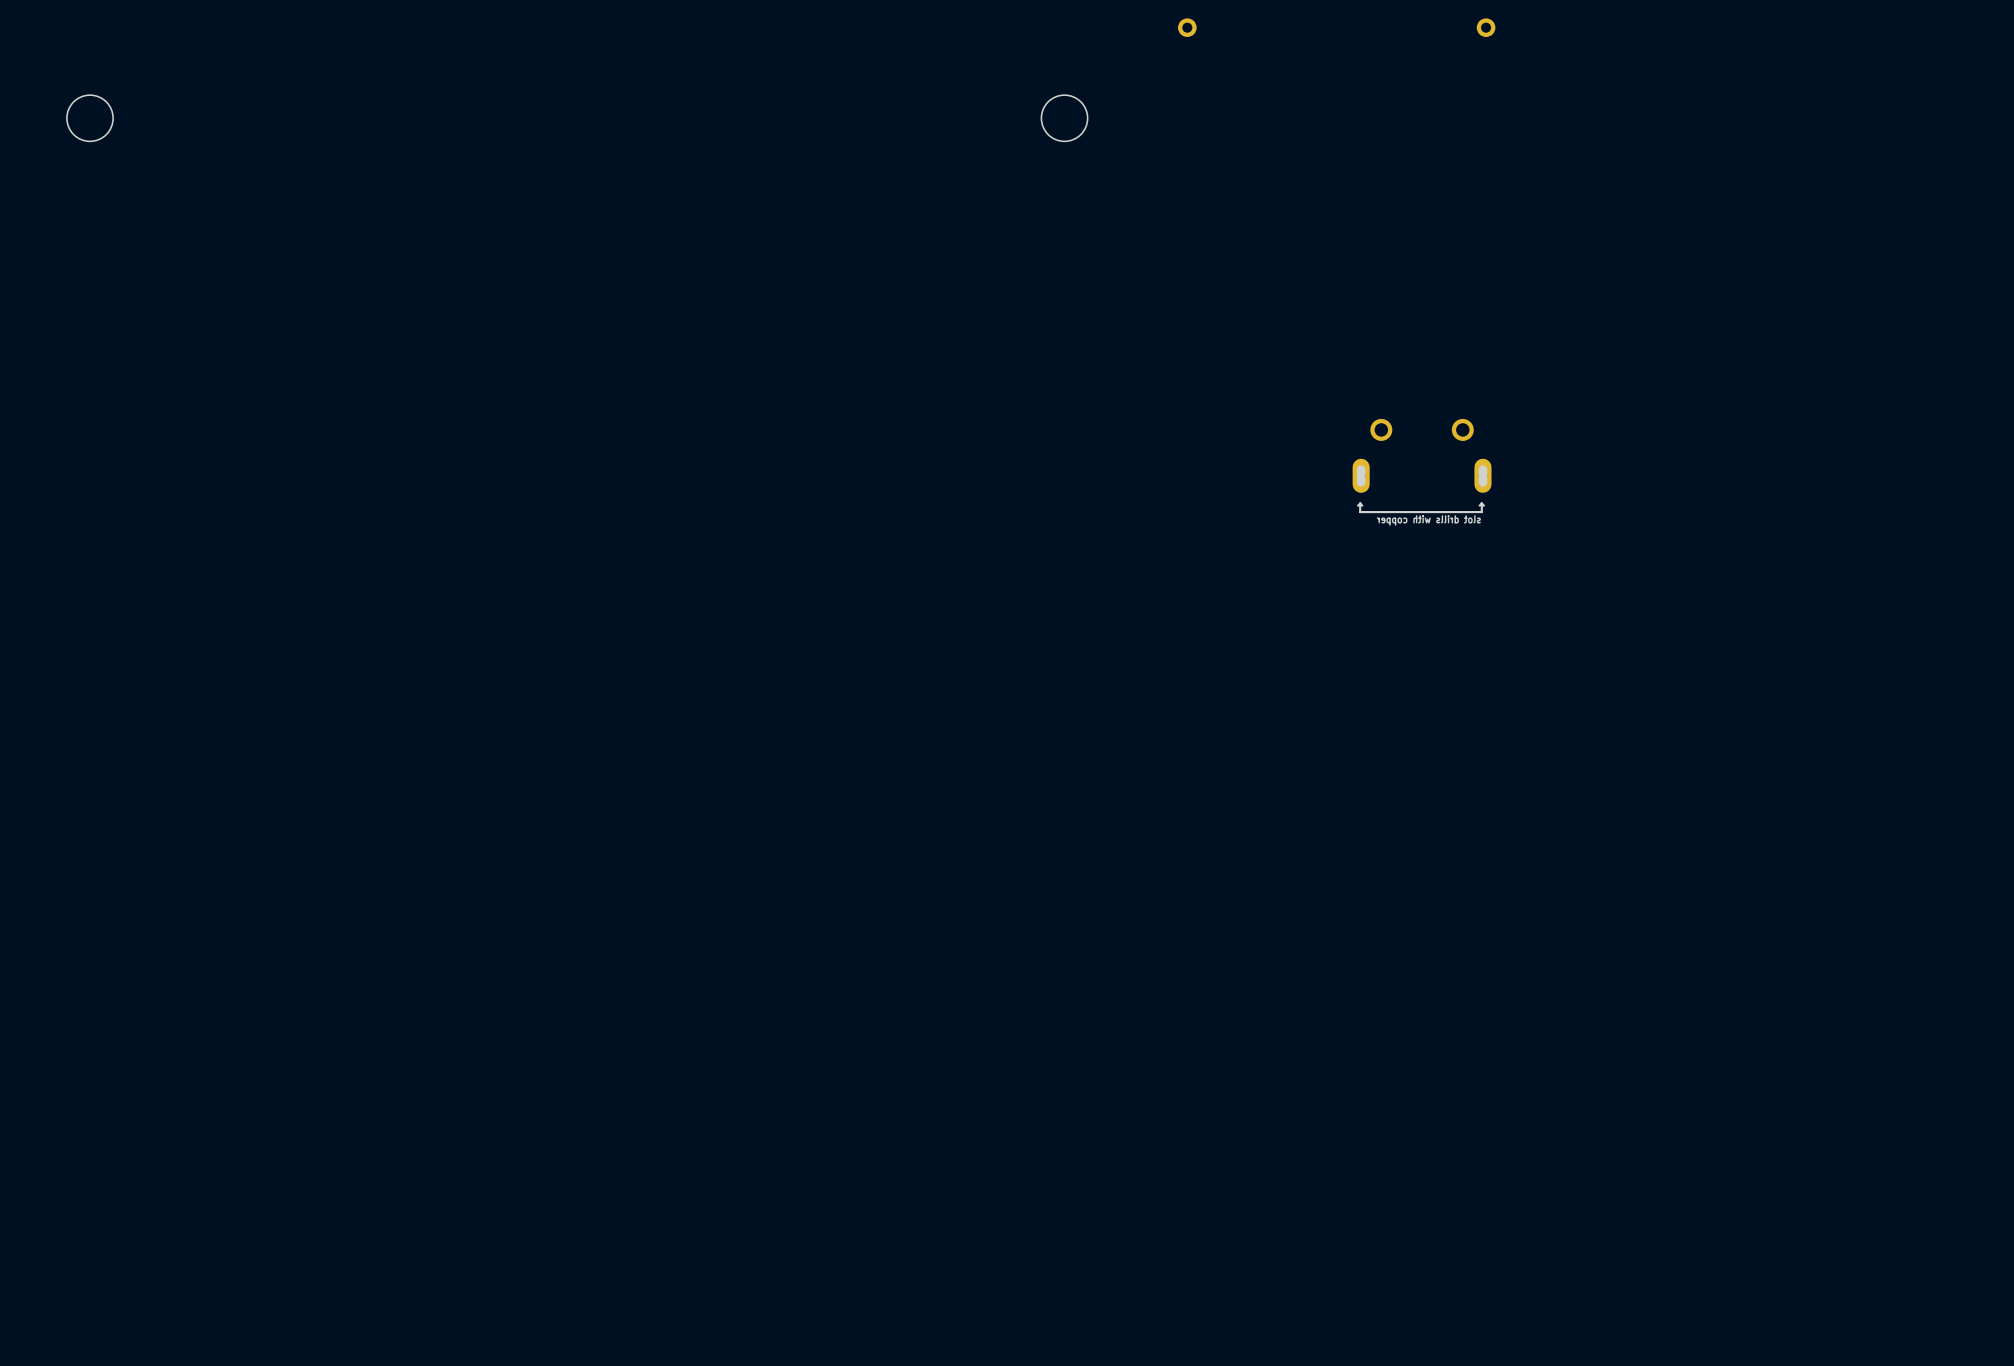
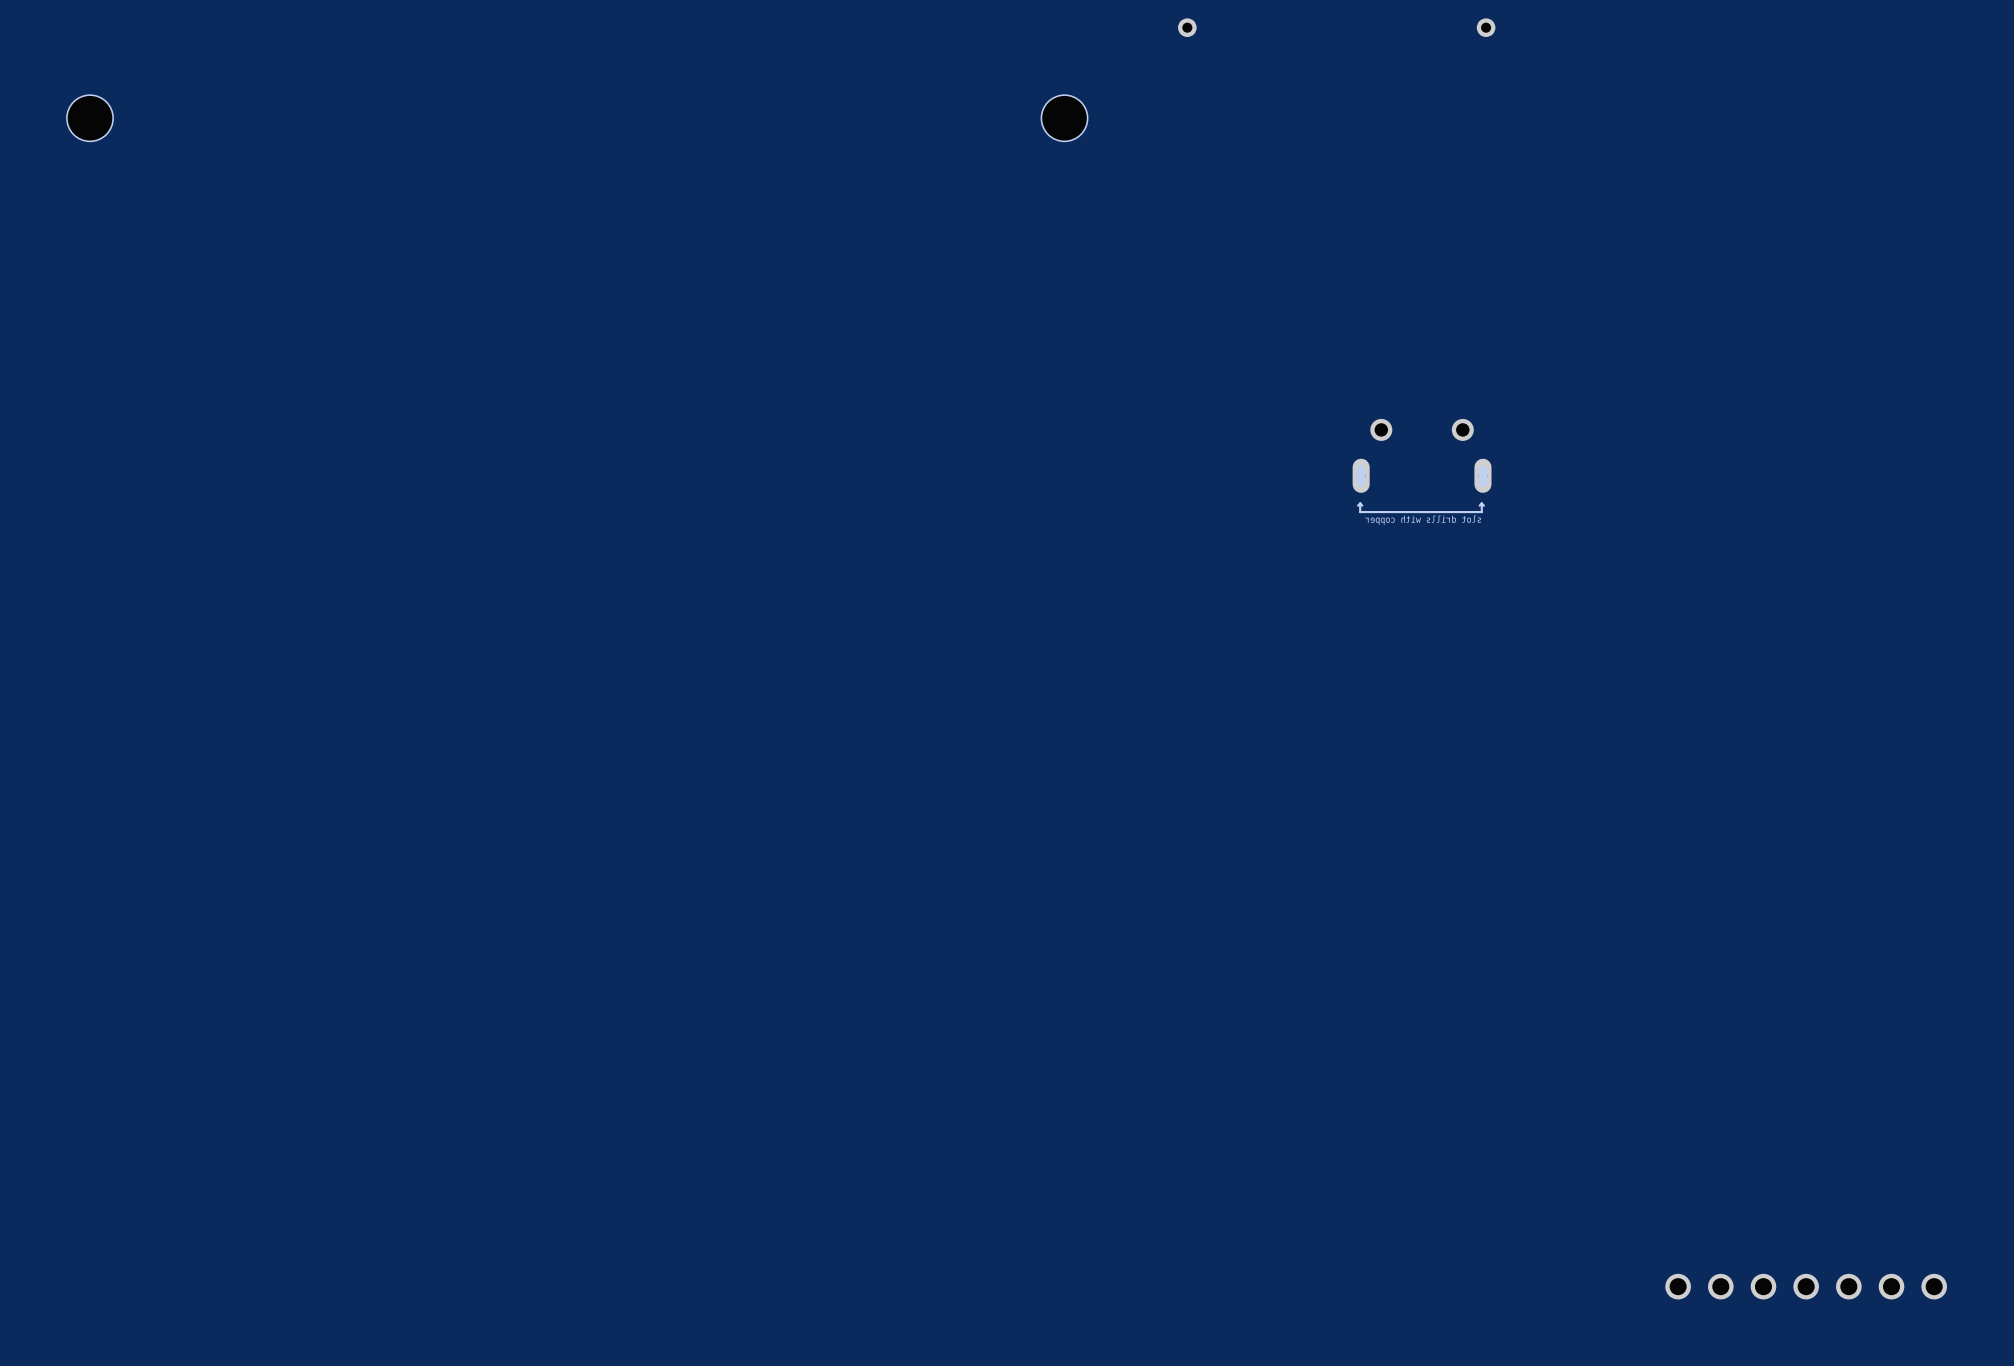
part: none -> (1806, 1286)

